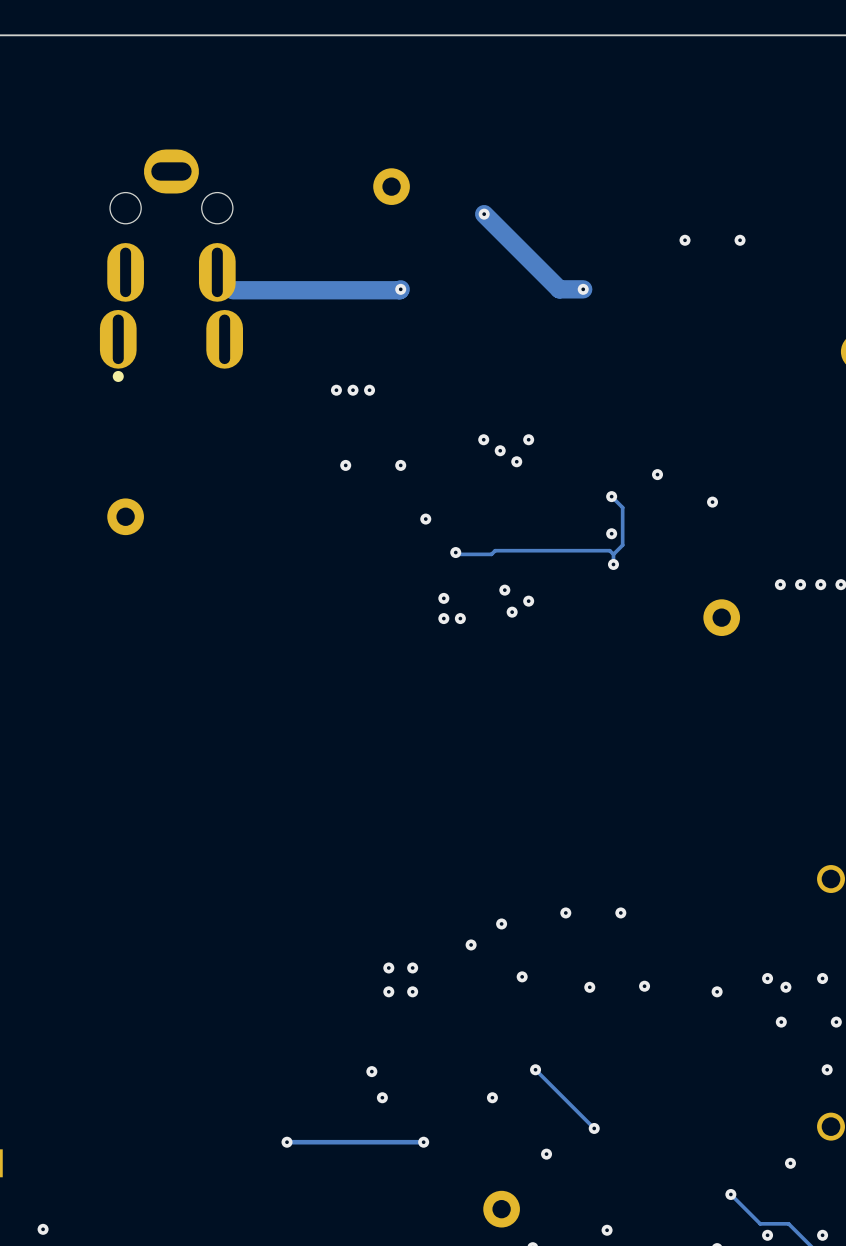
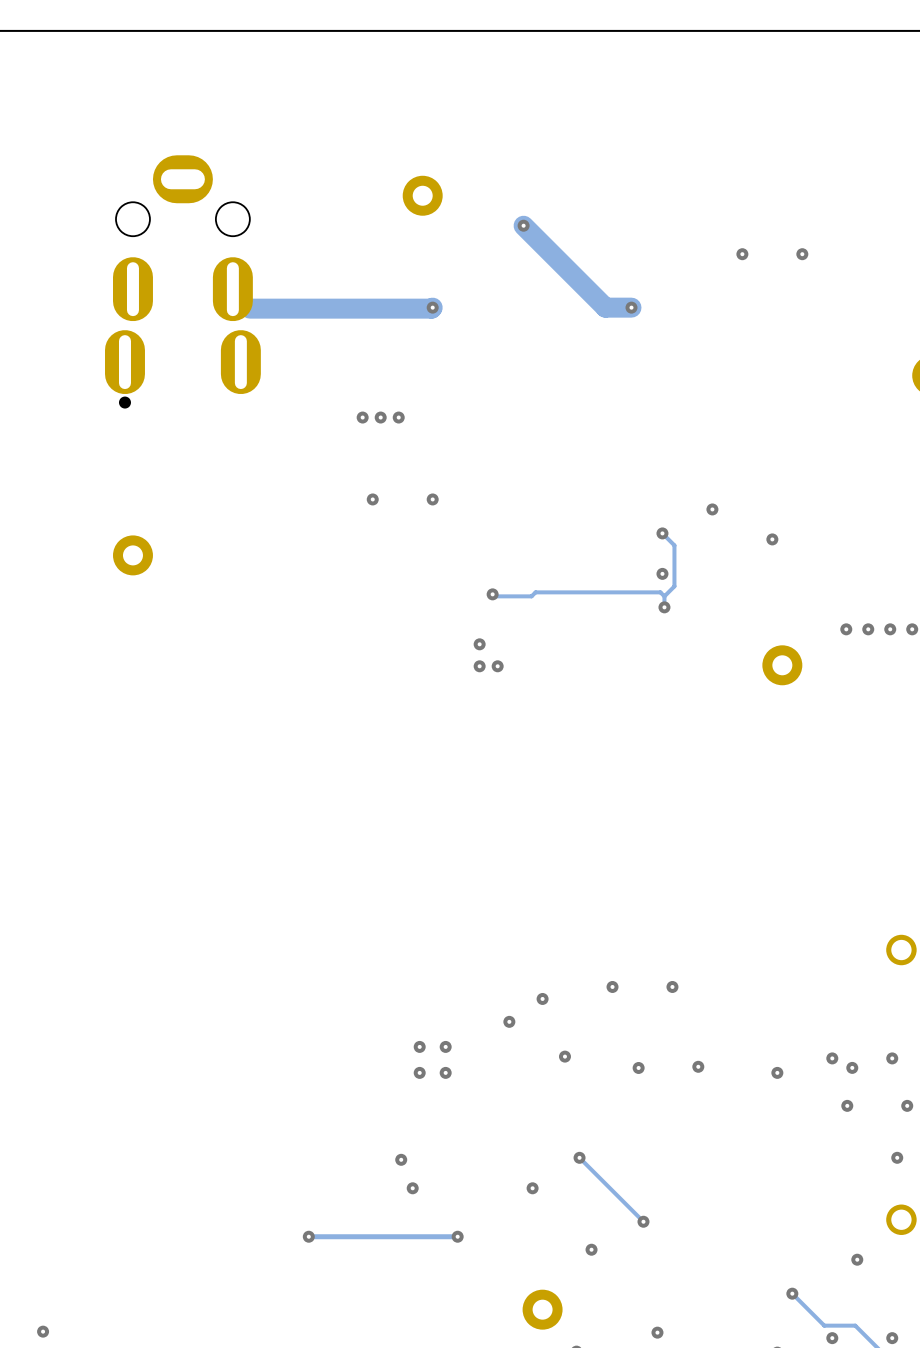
via: (483, 439) -> none
via: (528, 439) -> none
via: (500, 450) -> none
via: (516, 461) -> none
via: (425, 519) -> none
via: (504, 590) -> none
via: (528, 601) -> none
via: (512, 612) -> none

